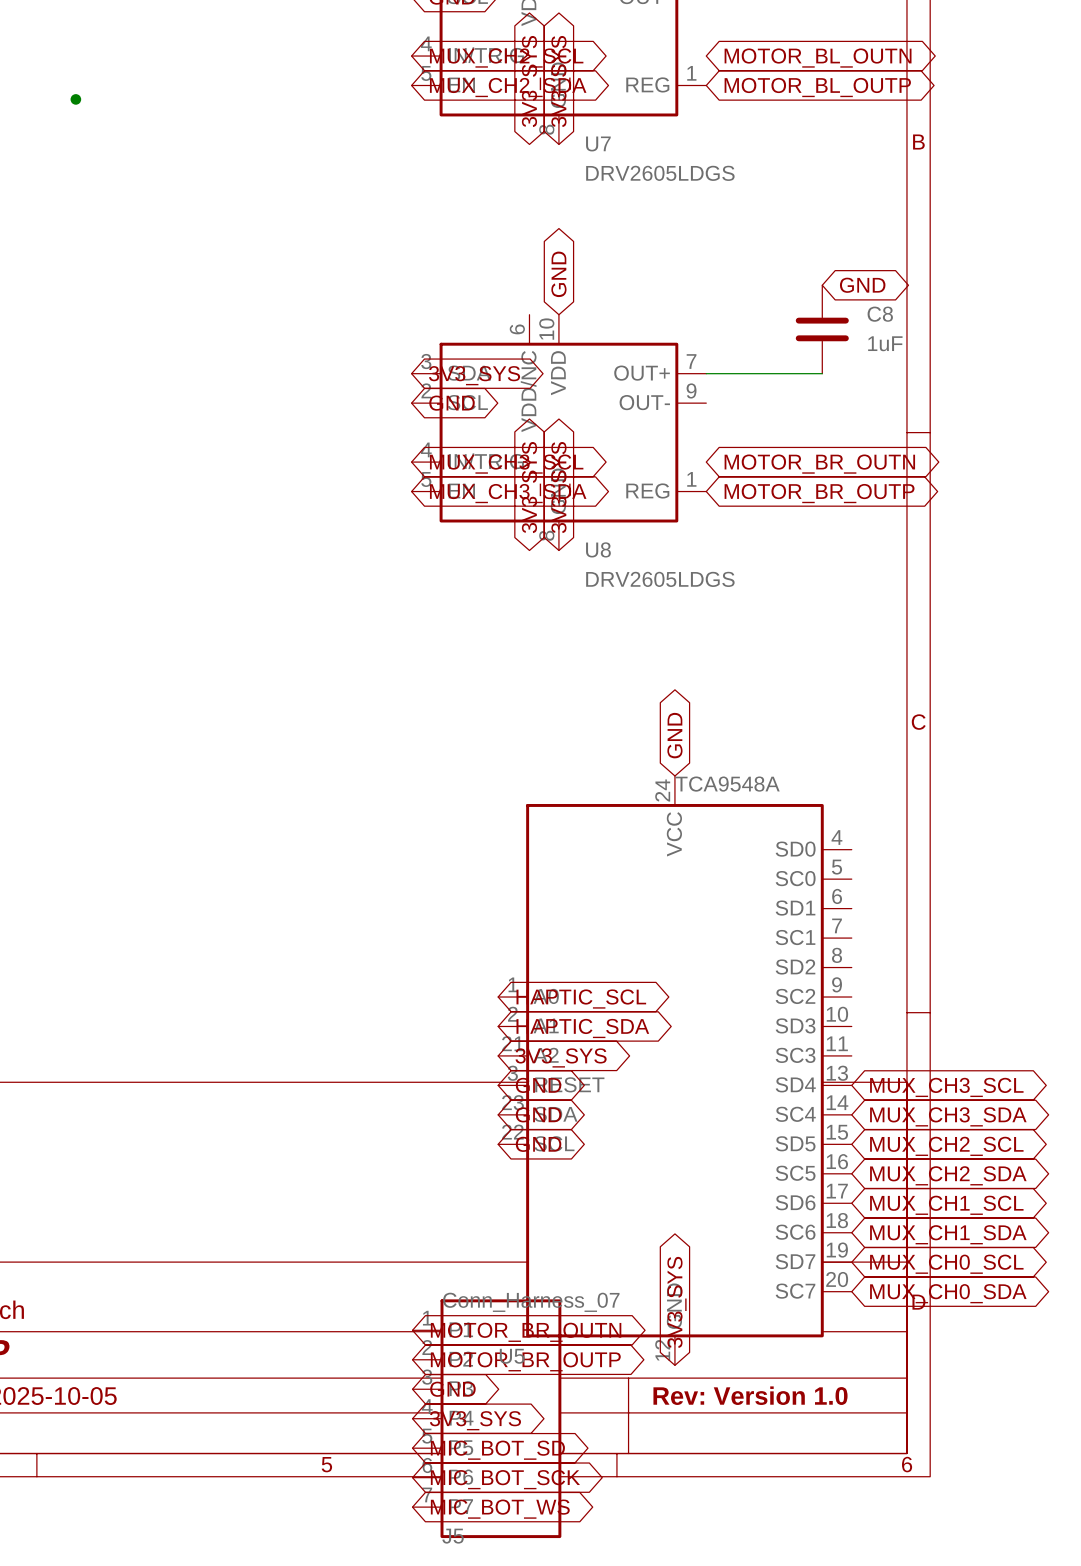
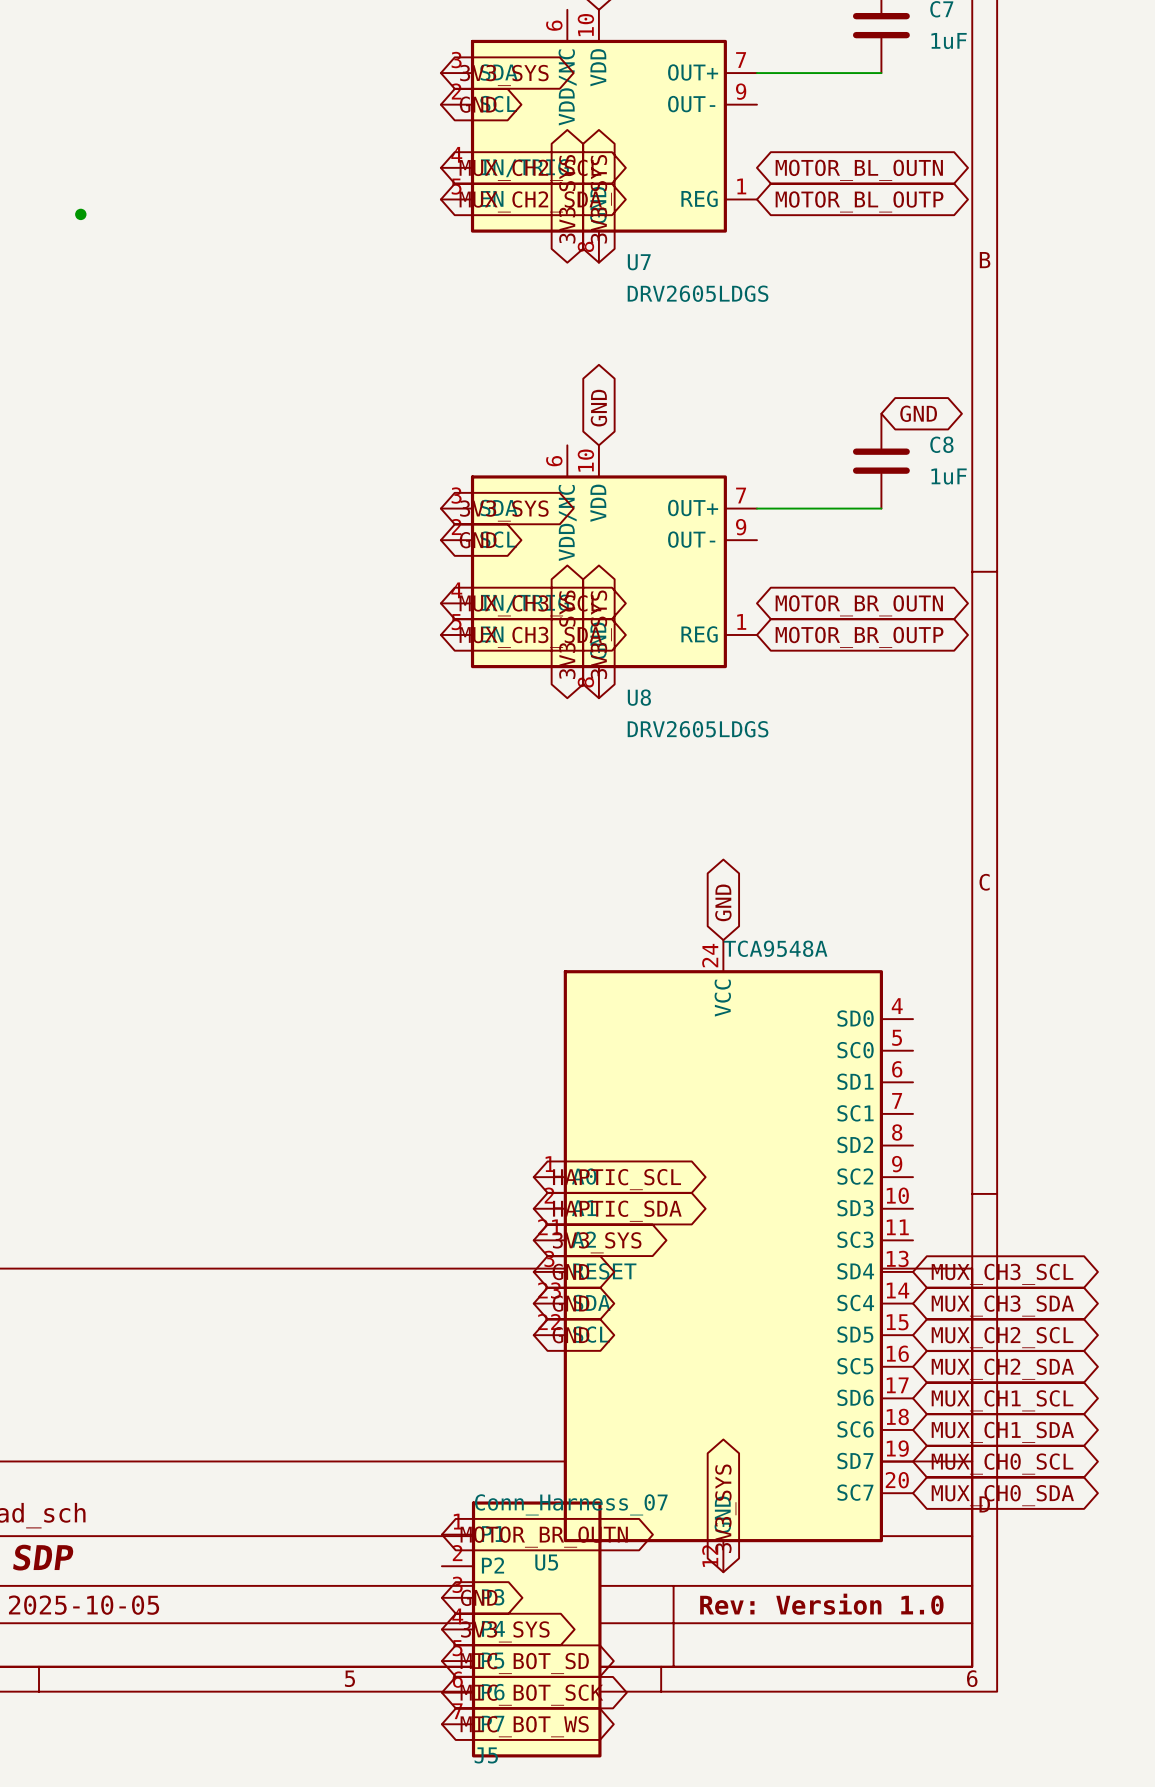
global label: MOTOR_BR_OUTP (525, 1361) -> none

